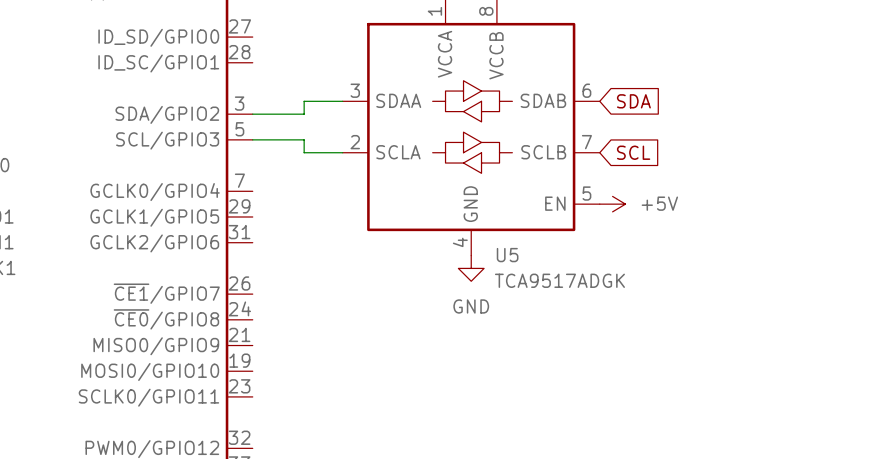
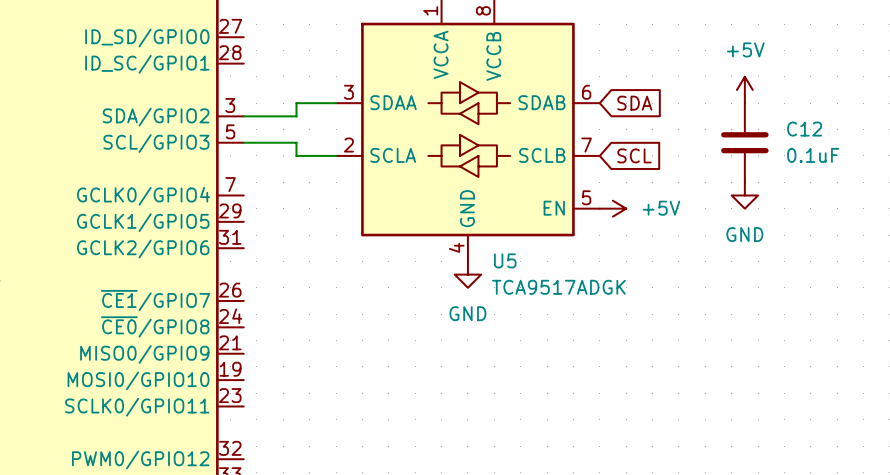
power symbol: none -> +5V (744, 89)
C12: none -> 0.1uF (744, 142)
power symbol: none -> GND (744, 195)

